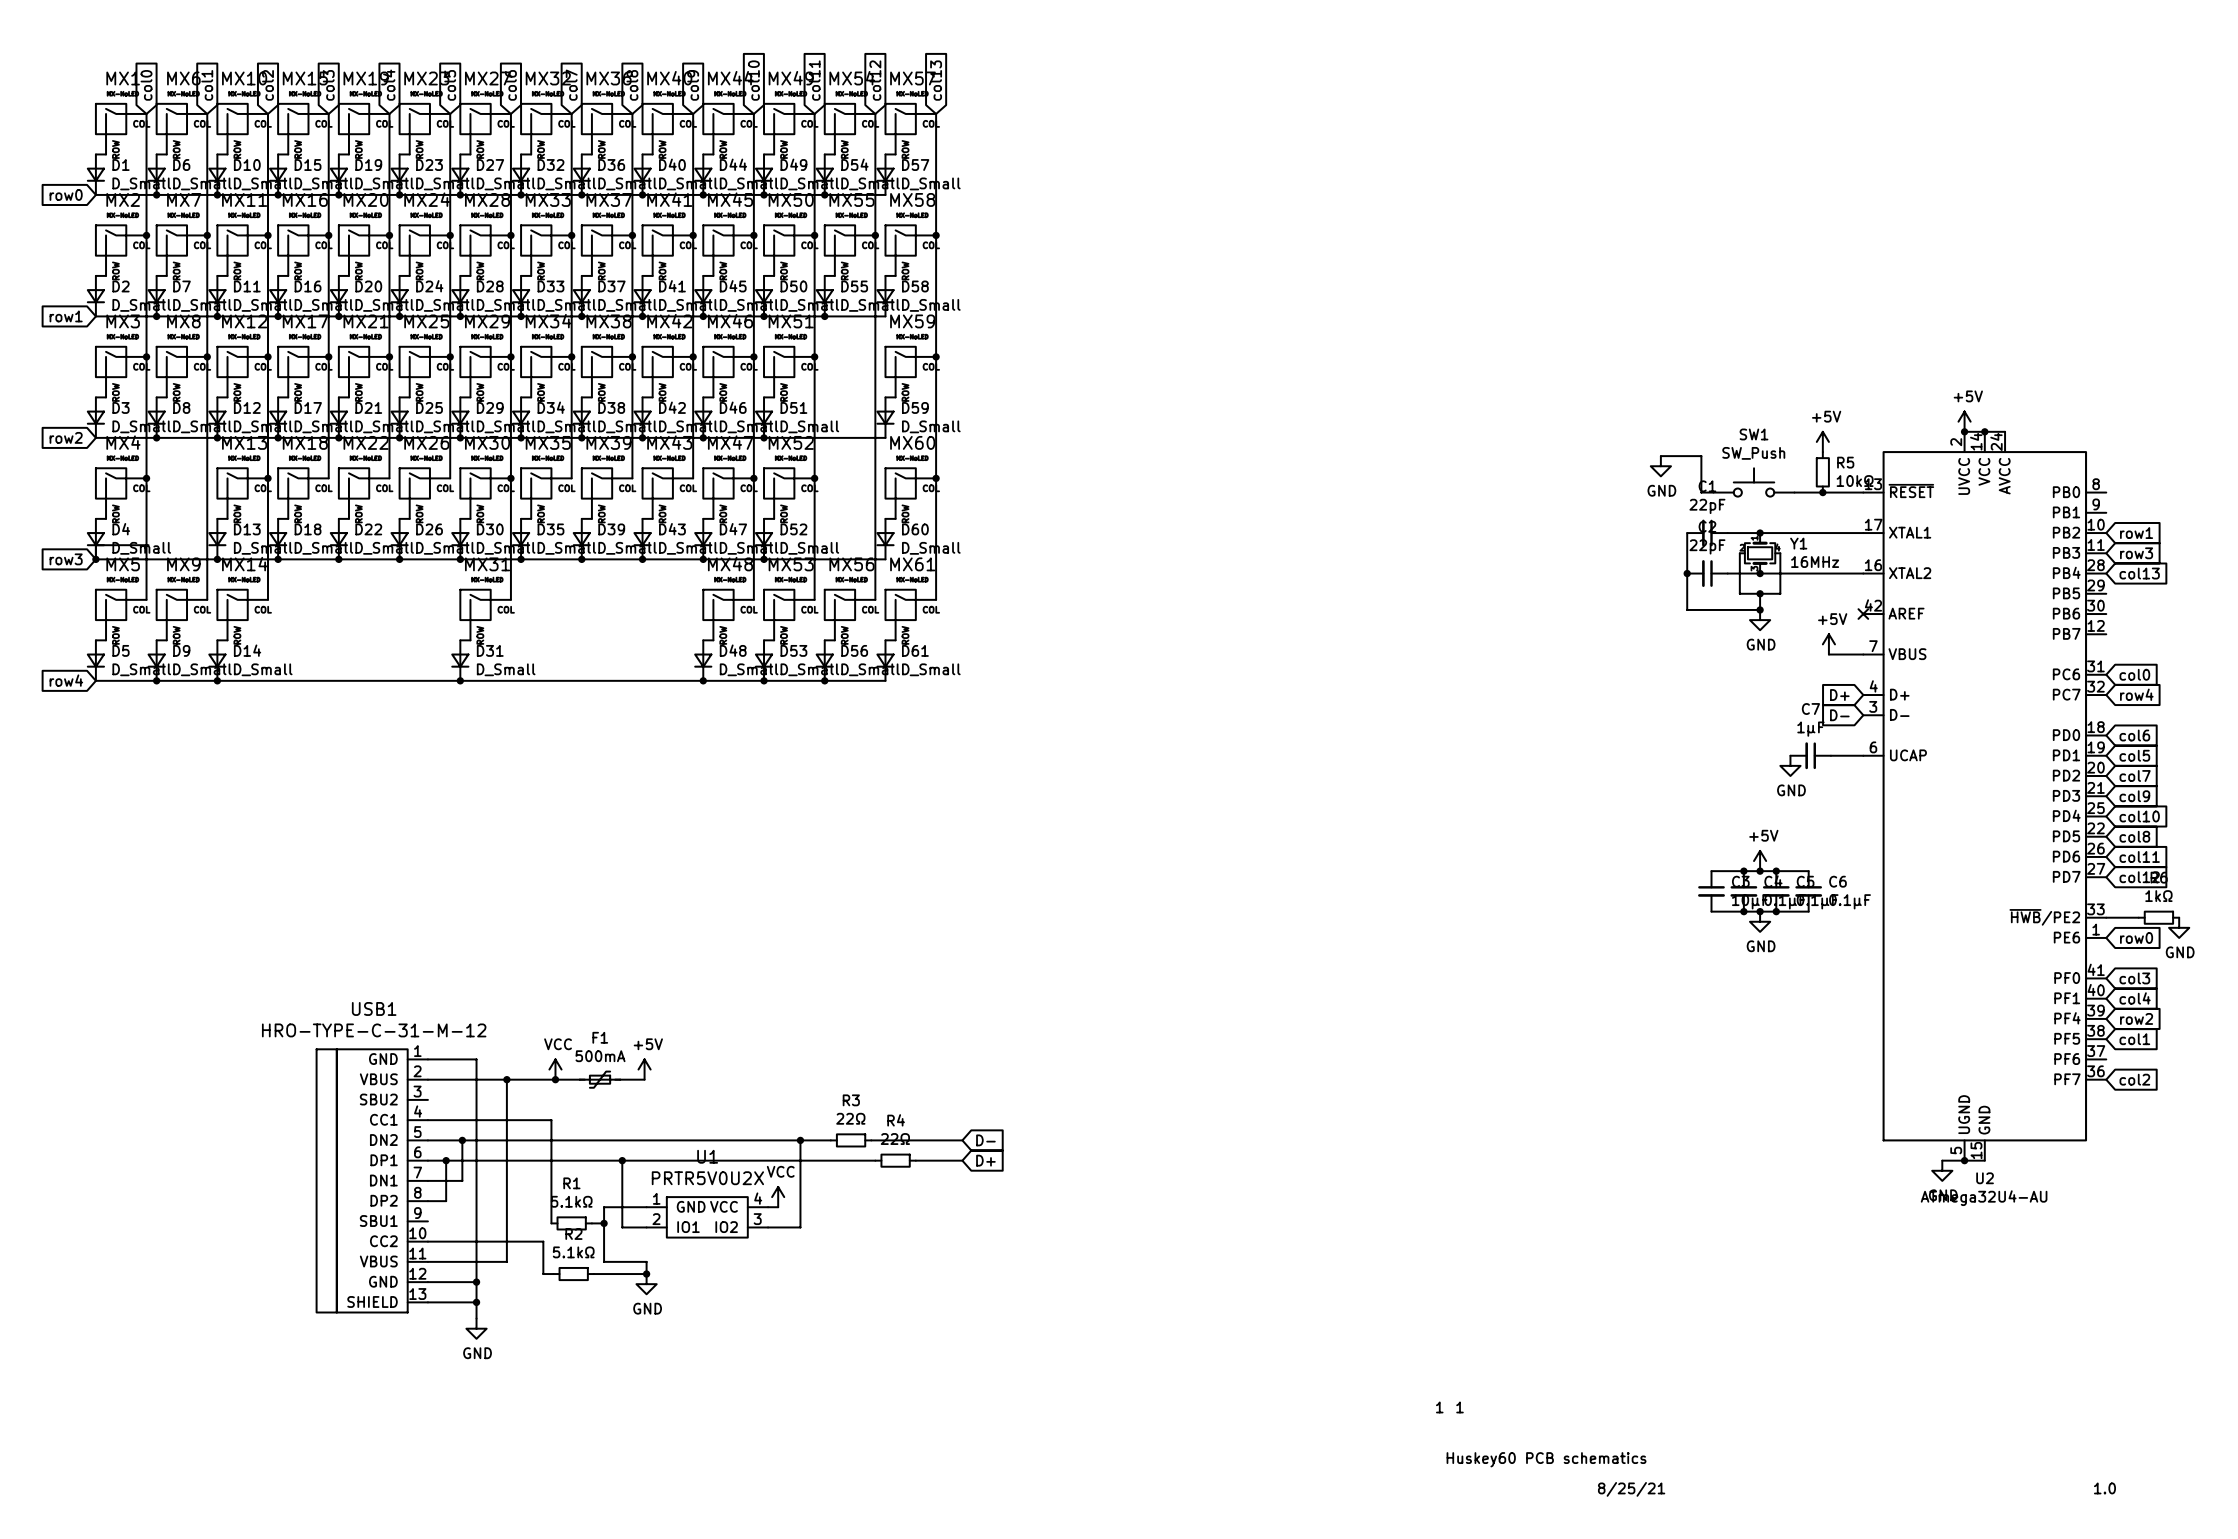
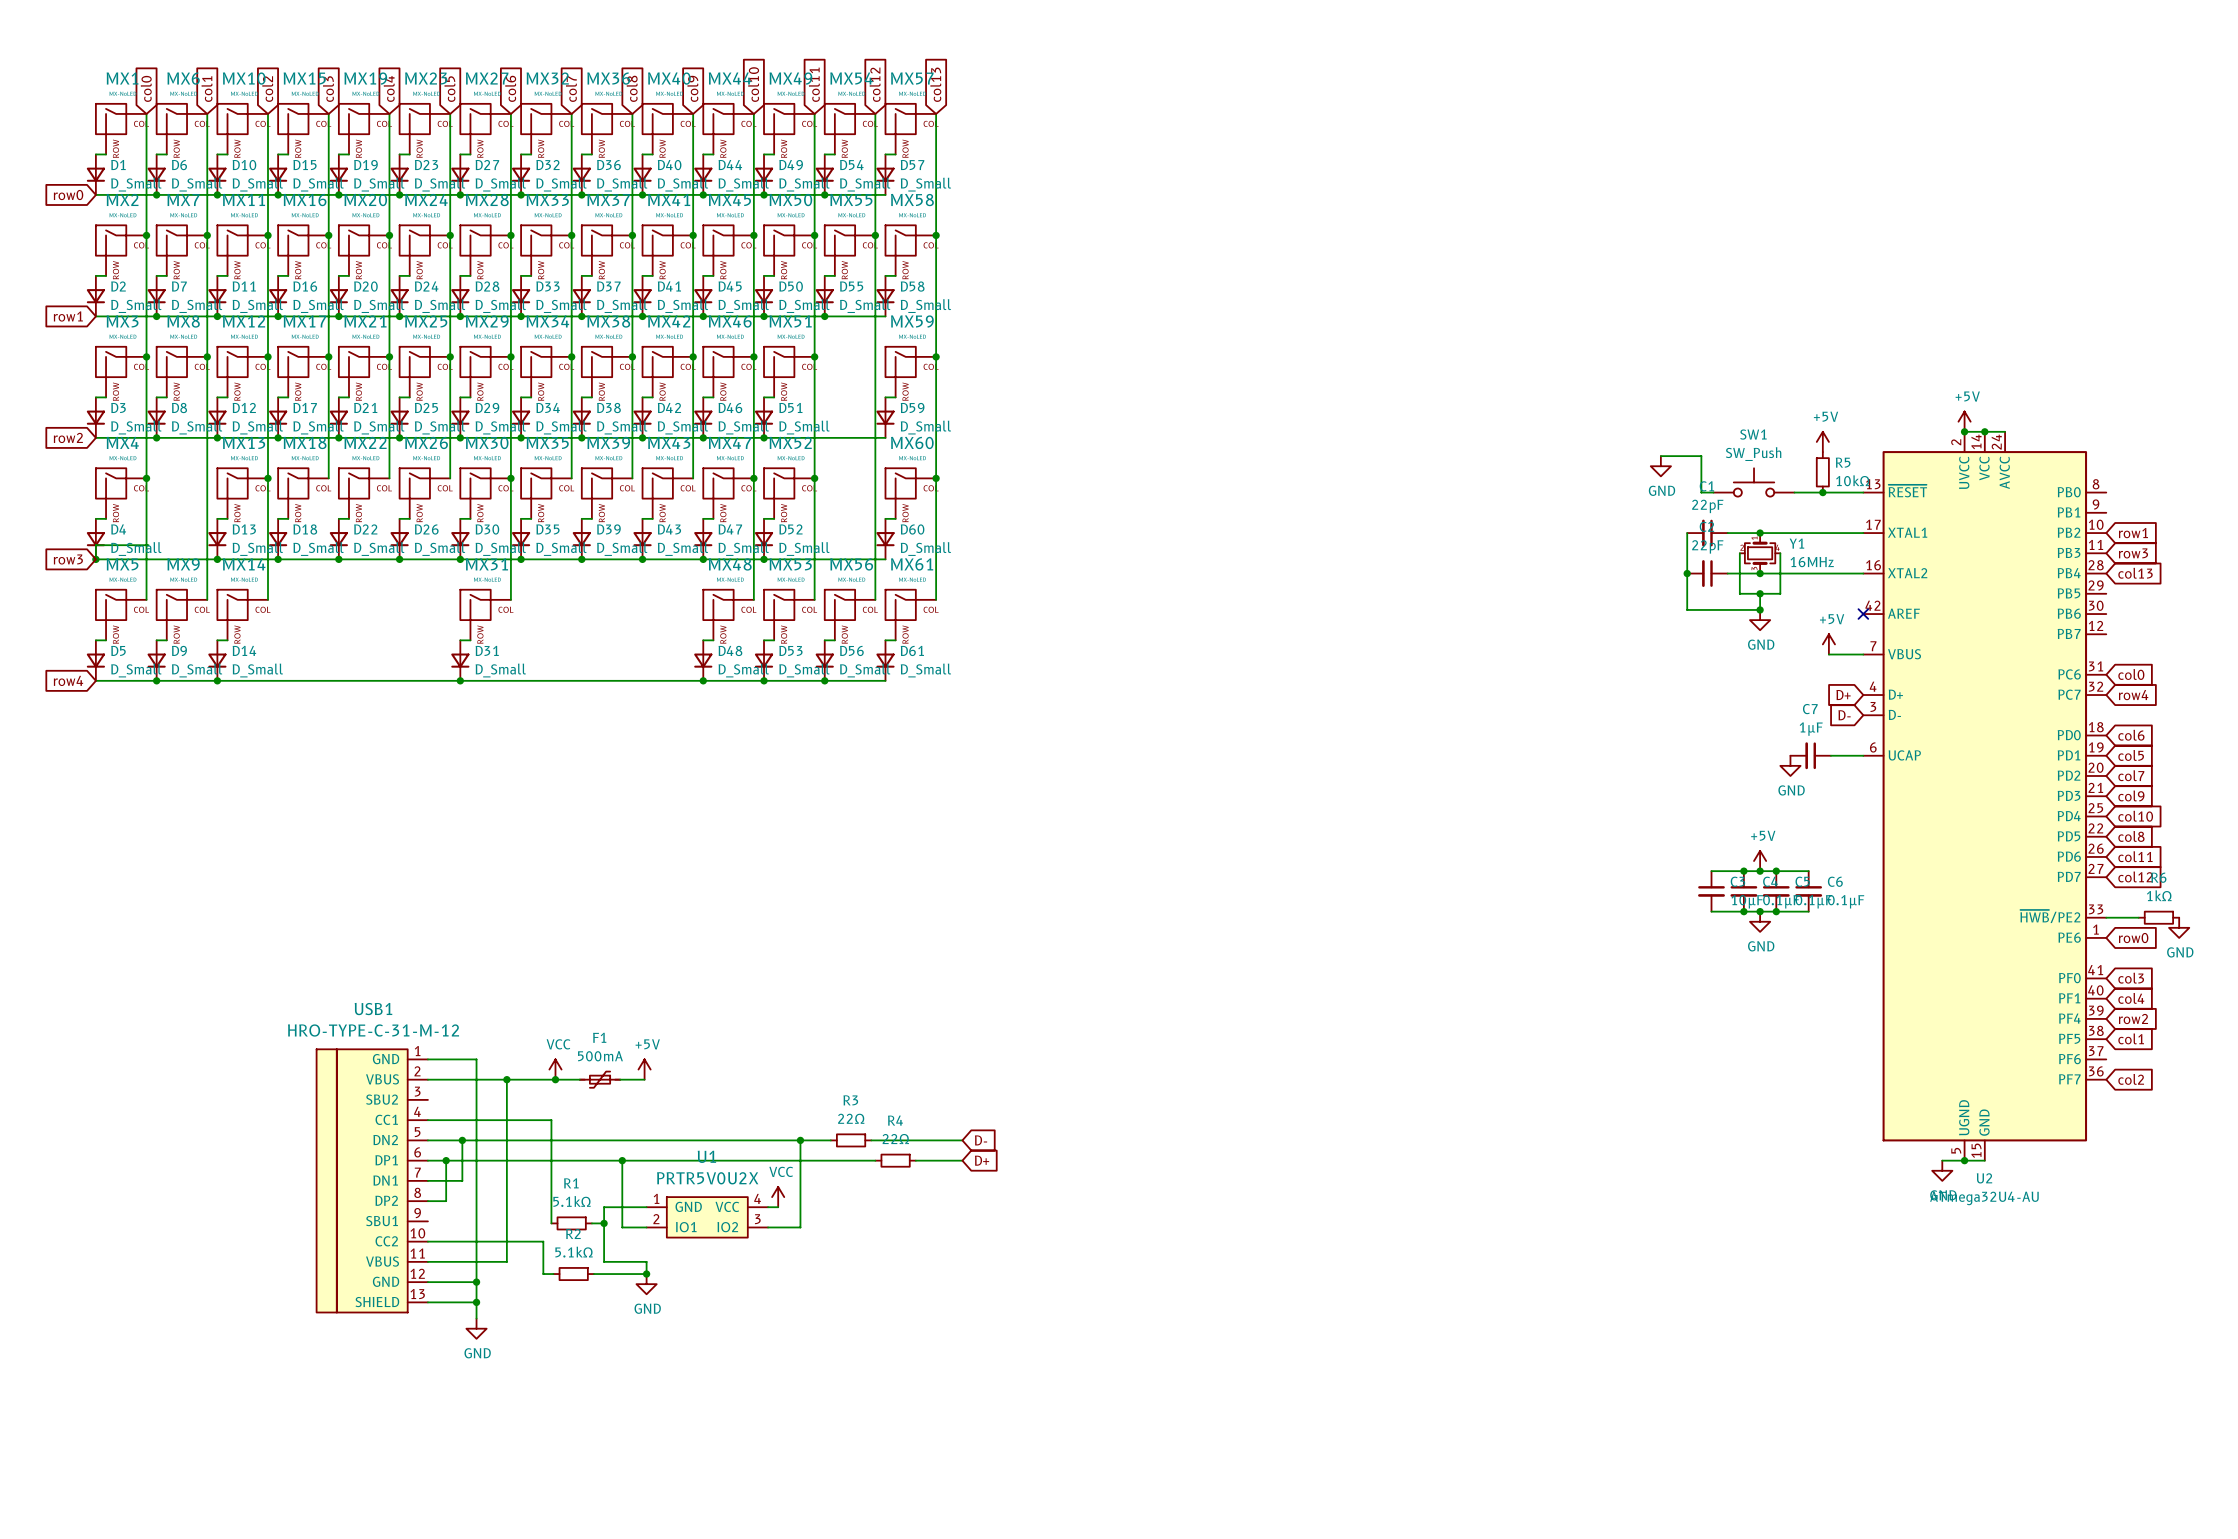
text: 1 (1439, 1407) -> none
text: 1 (1460, 1407) -> none
text: Huskey60 PCB schematics (1546, 1459) -> none
text: 1.0 (2104, 1488) -> none
text: 8/25/21 (1631, 1489) -> none

